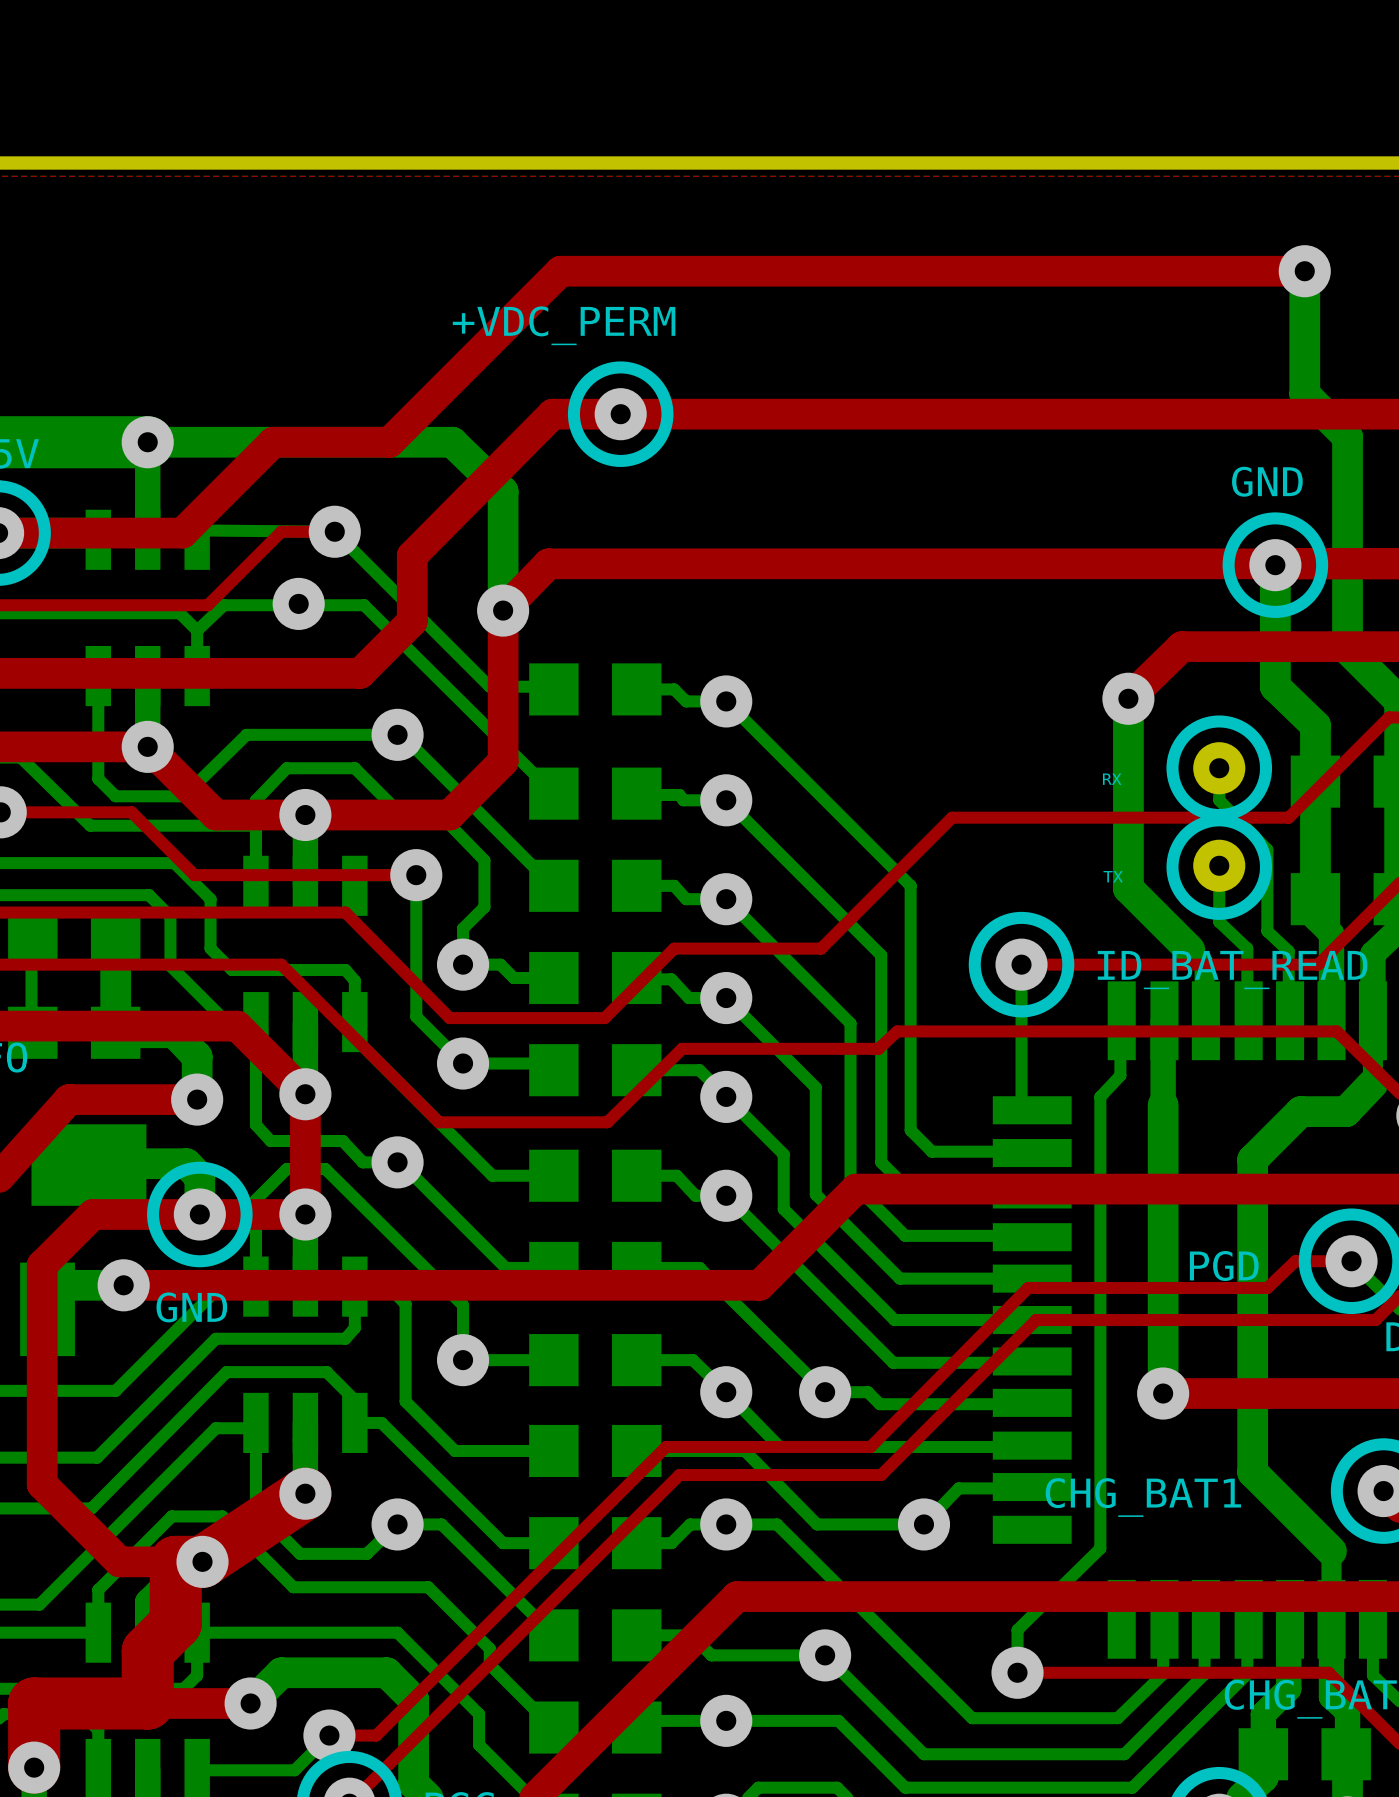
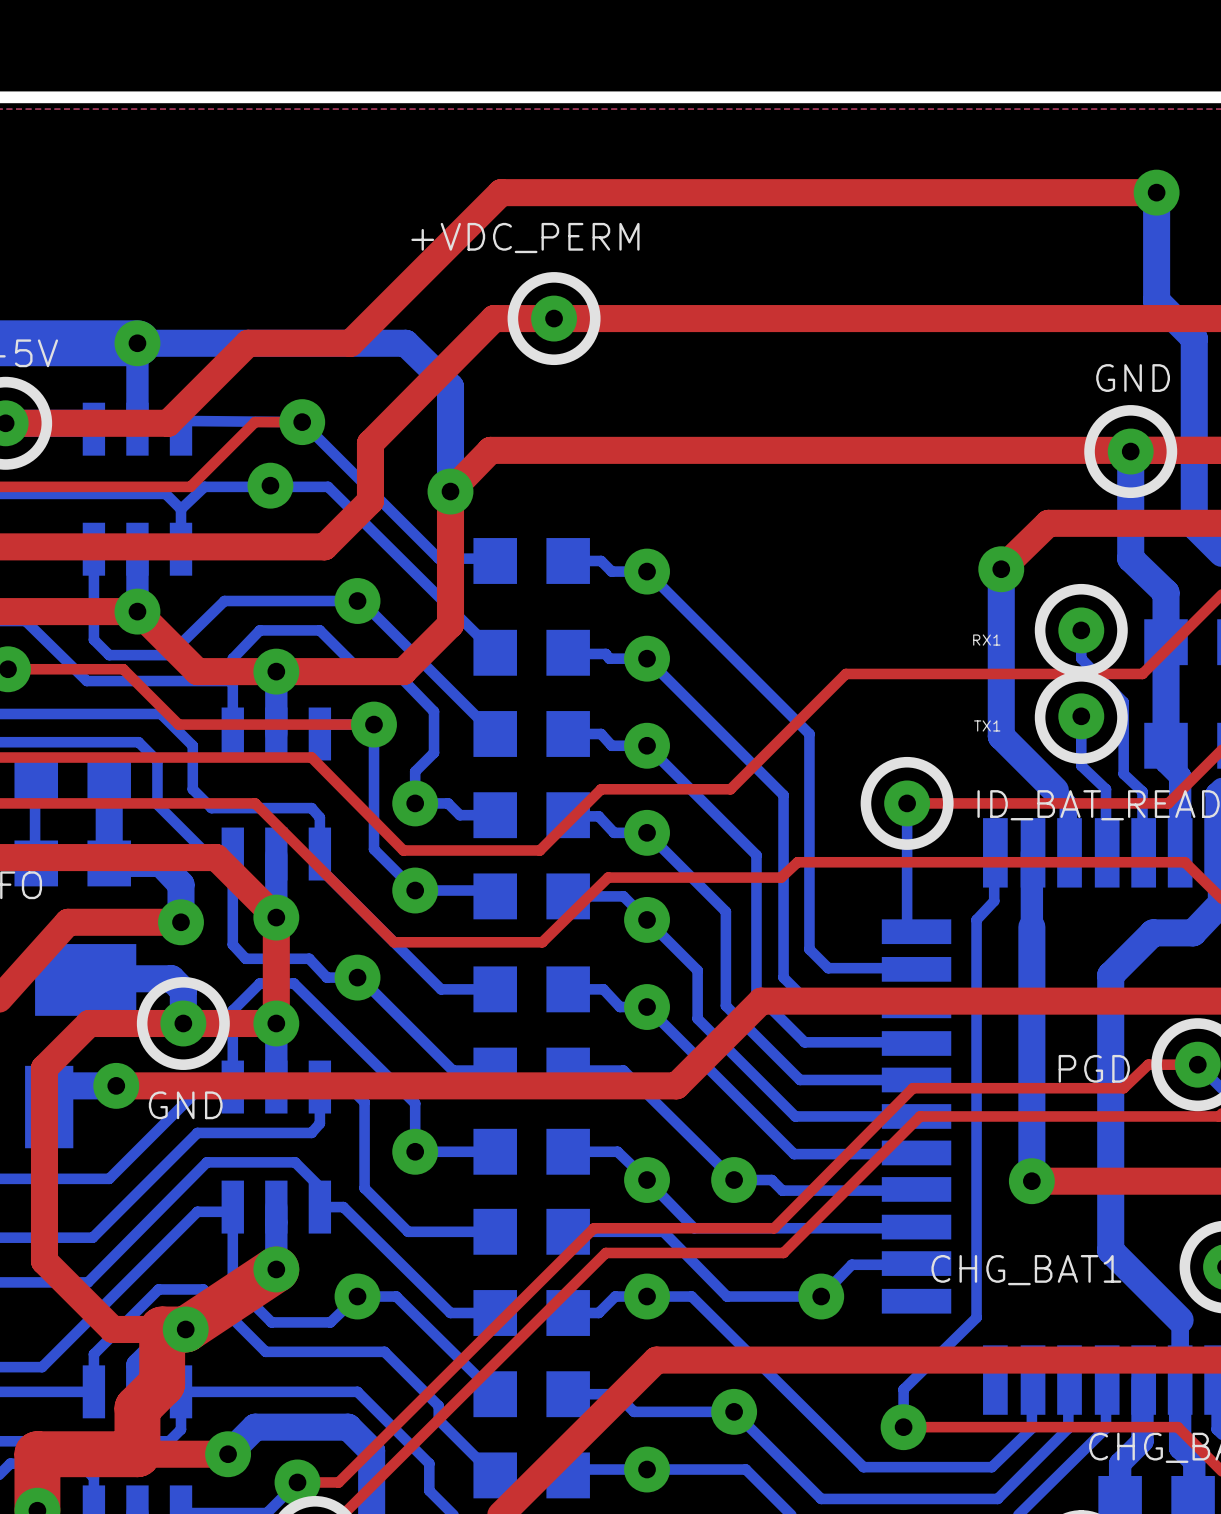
RX name: RX (1112, 779) -> RX1 (986, 640)
TX name: TX (1113, 876) -> TX1 (987, 725)

